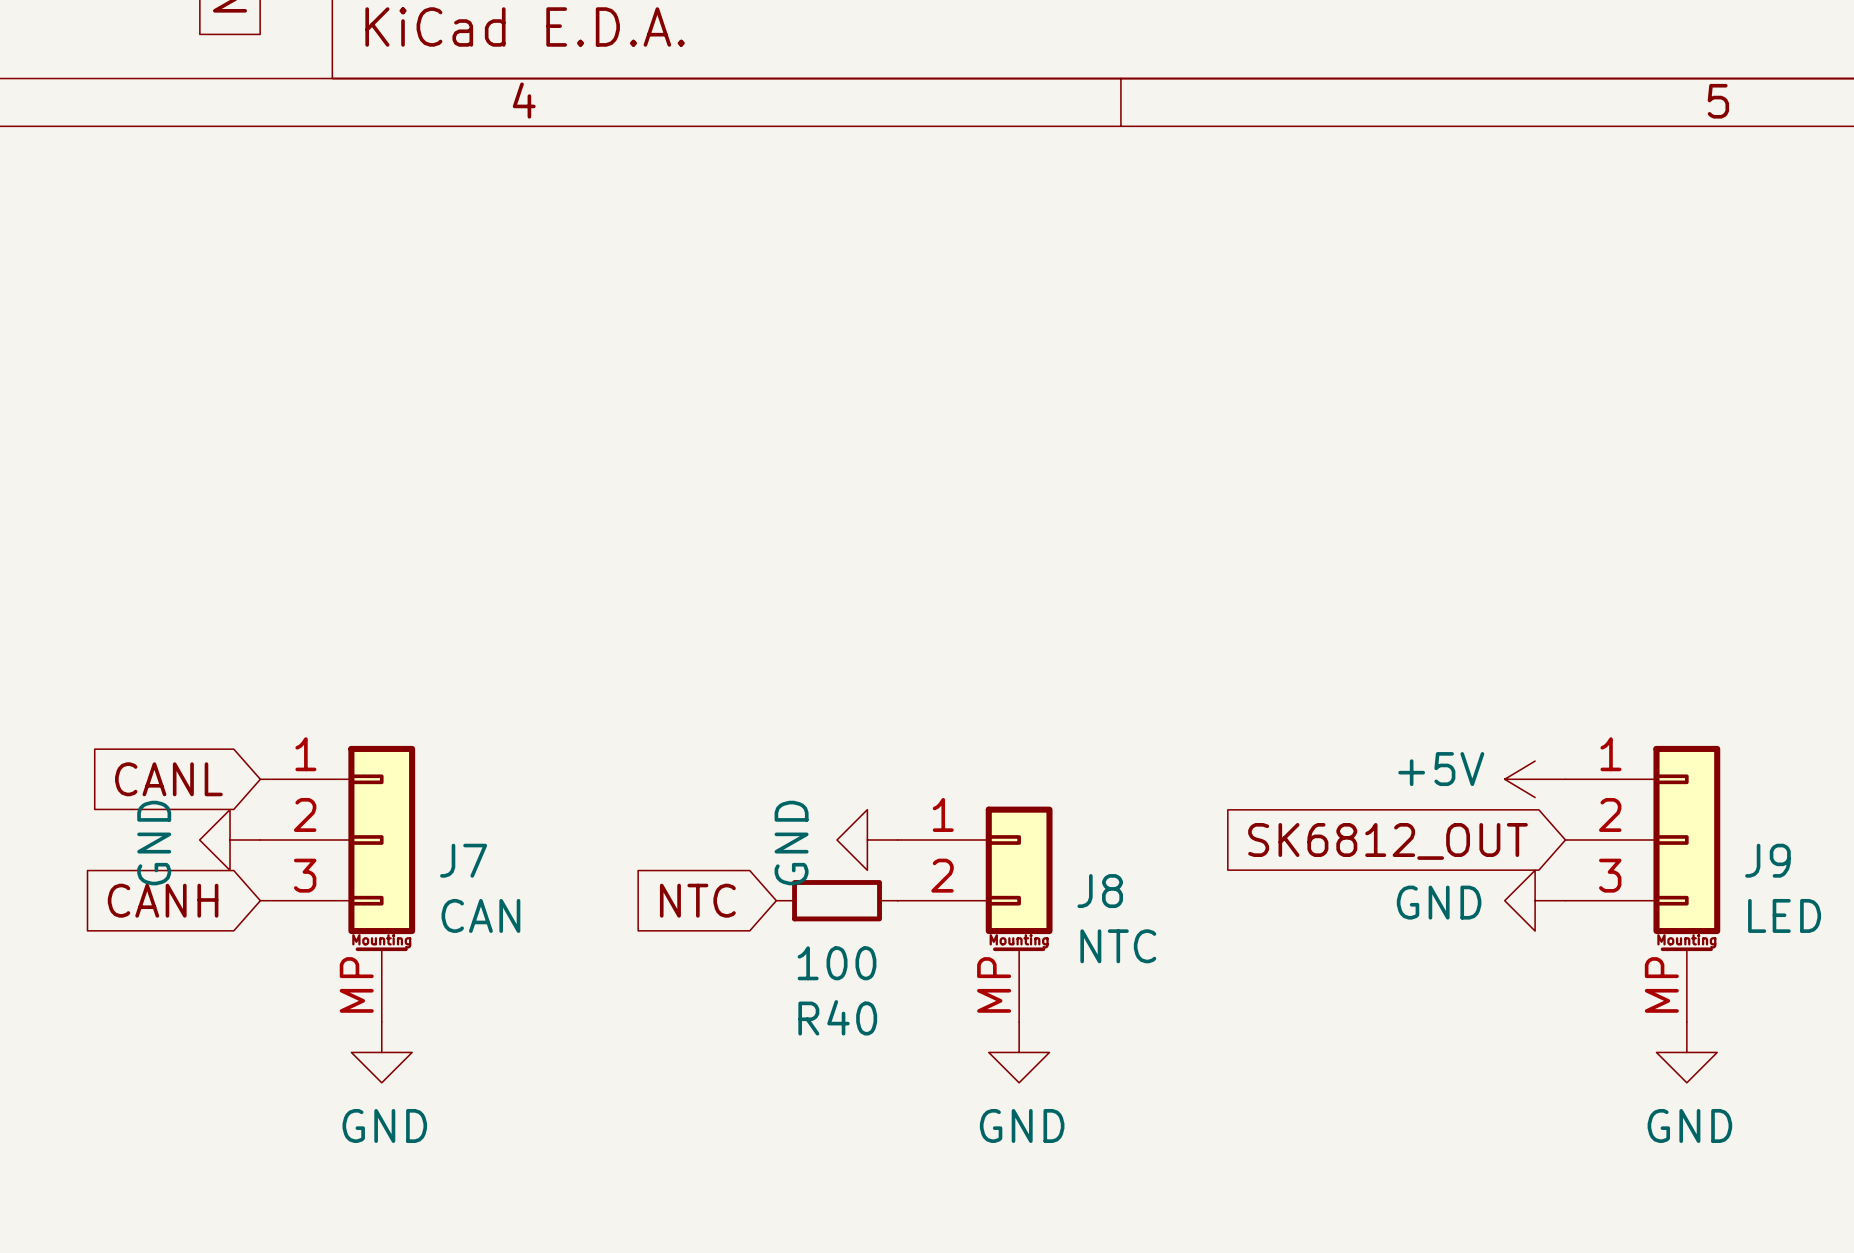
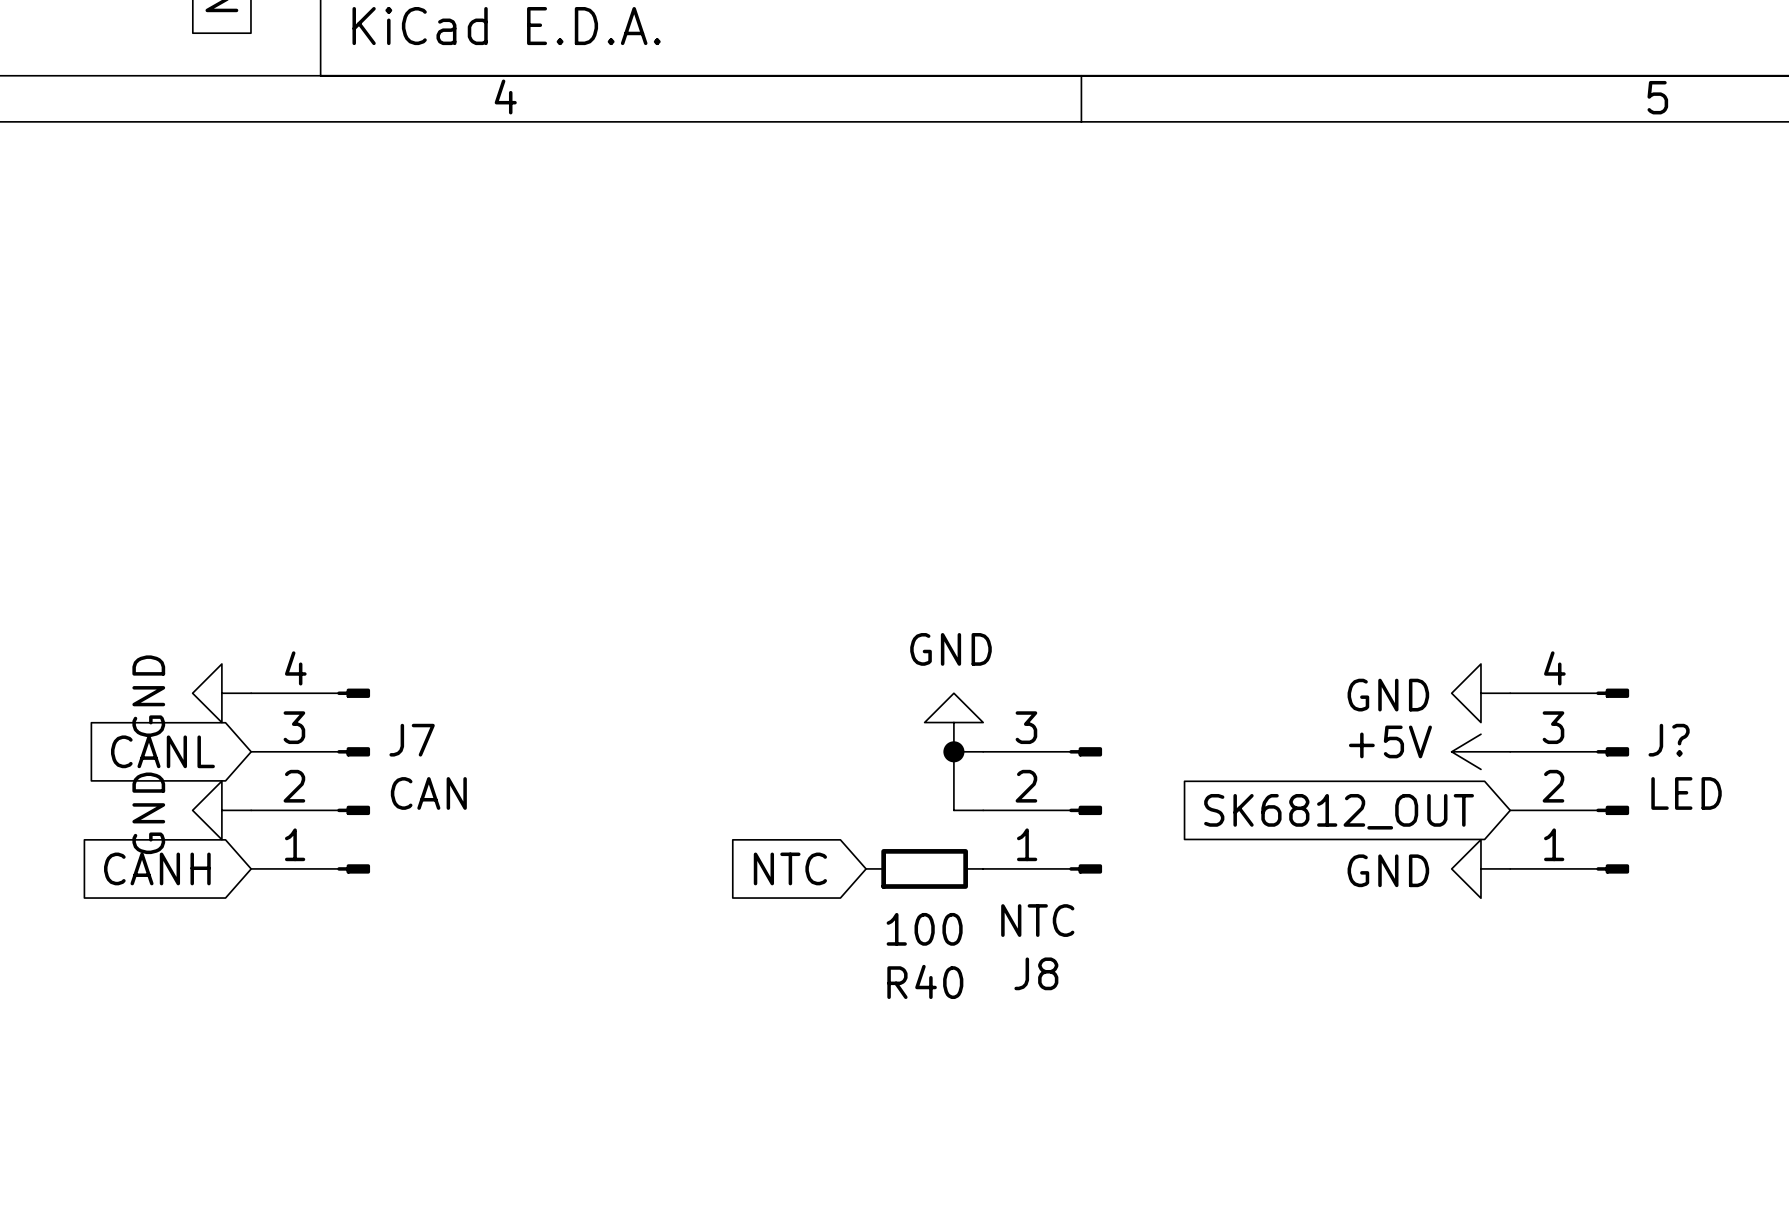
power symbol: none -> GND (221, 693)
power symbol: none -> GND (1480, 693)
J7 symbol: [260, 745, 416, 1023] -> [251, 688, 371, 874]
junction: none -> (953, 751)
wire: none -> (983, 751) (953, 751) (953, 810) (983, 810)
J8 symbol: [897, 806, 1053, 1023] -> [983, 747, 1103, 874]
J?: none -> LED (1569, 781)
power symbol rotation: 0° (867, 839) -> 90° clockwise (953, 722)
power symbol position: GND (867, 839) -> GND (953, 722)
J9: LED (1642, 884) -> none
J8 name position: J8 (1100, 891) -> J8 (1036, 973)
global label position: NTC (697, 900) -> NTC (790, 868)
R40 position: (837, 900) -> (924, 868)
J8 value position: NTC (1118, 946) -> NTC (1037, 920)
power symbol: GND (381, 1052) -> none
power symbol: GND (1019, 1052) -> none
power symbol: GND (1686, 1052) -> none

